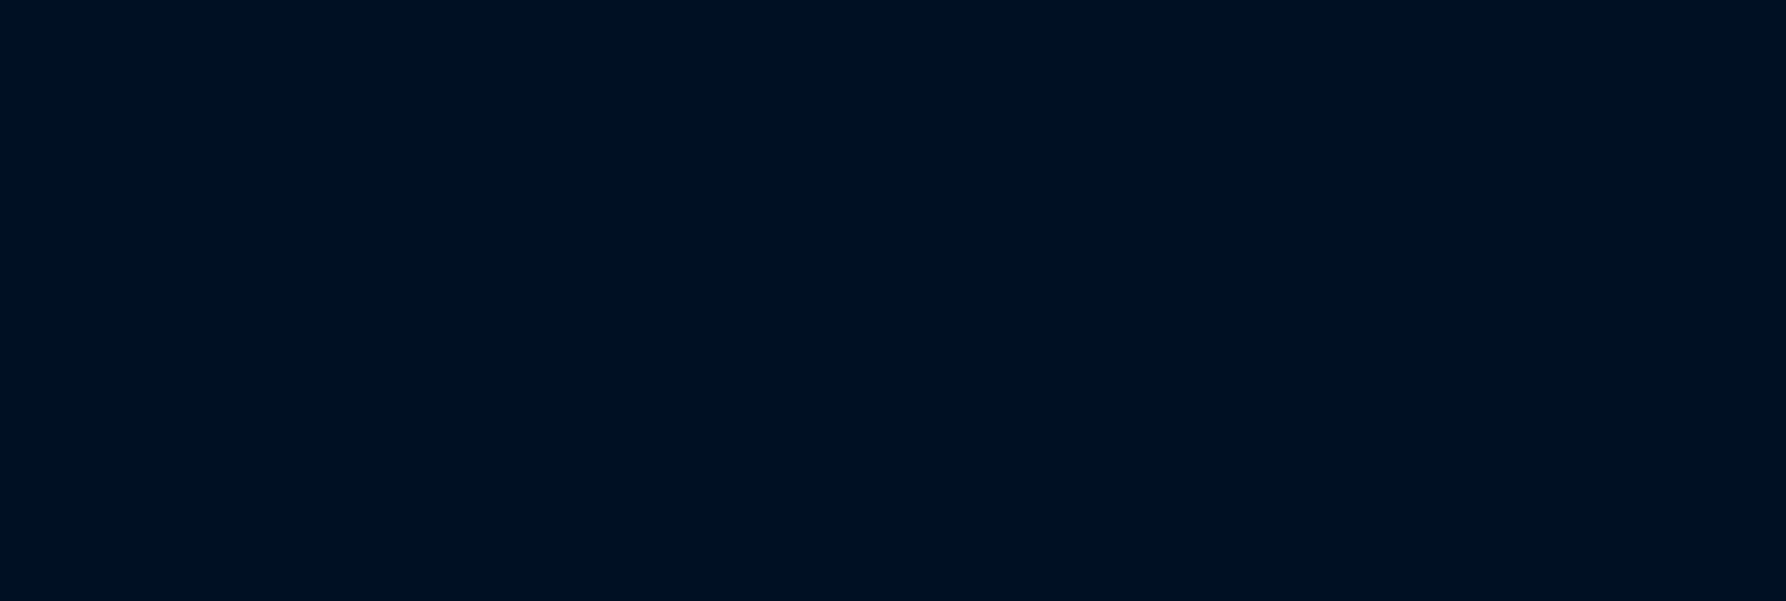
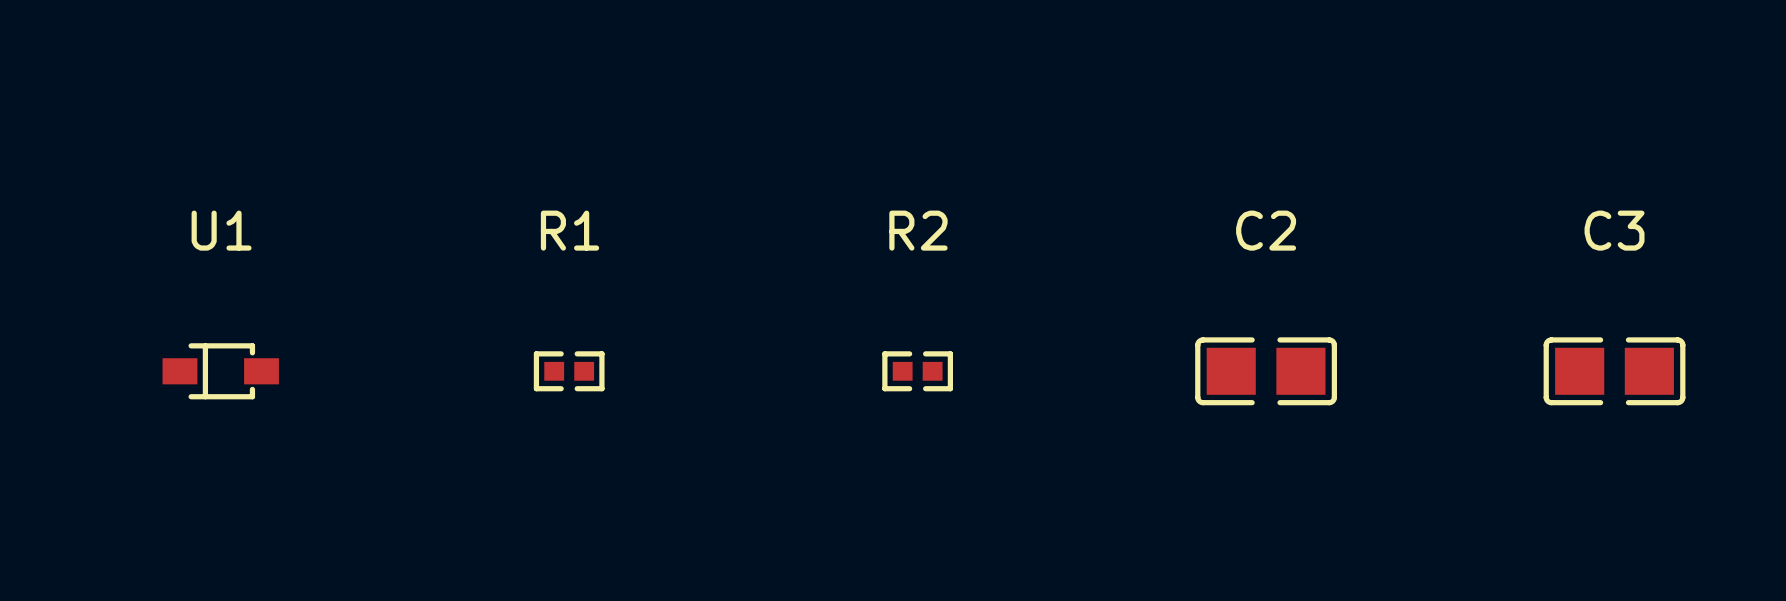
U1: none -> (220, 371)
R1: none -> (569, 371)
R2: none -> (917, 371)
C2: none -> (1266, 371)
C3: none -> (1614, 371)

